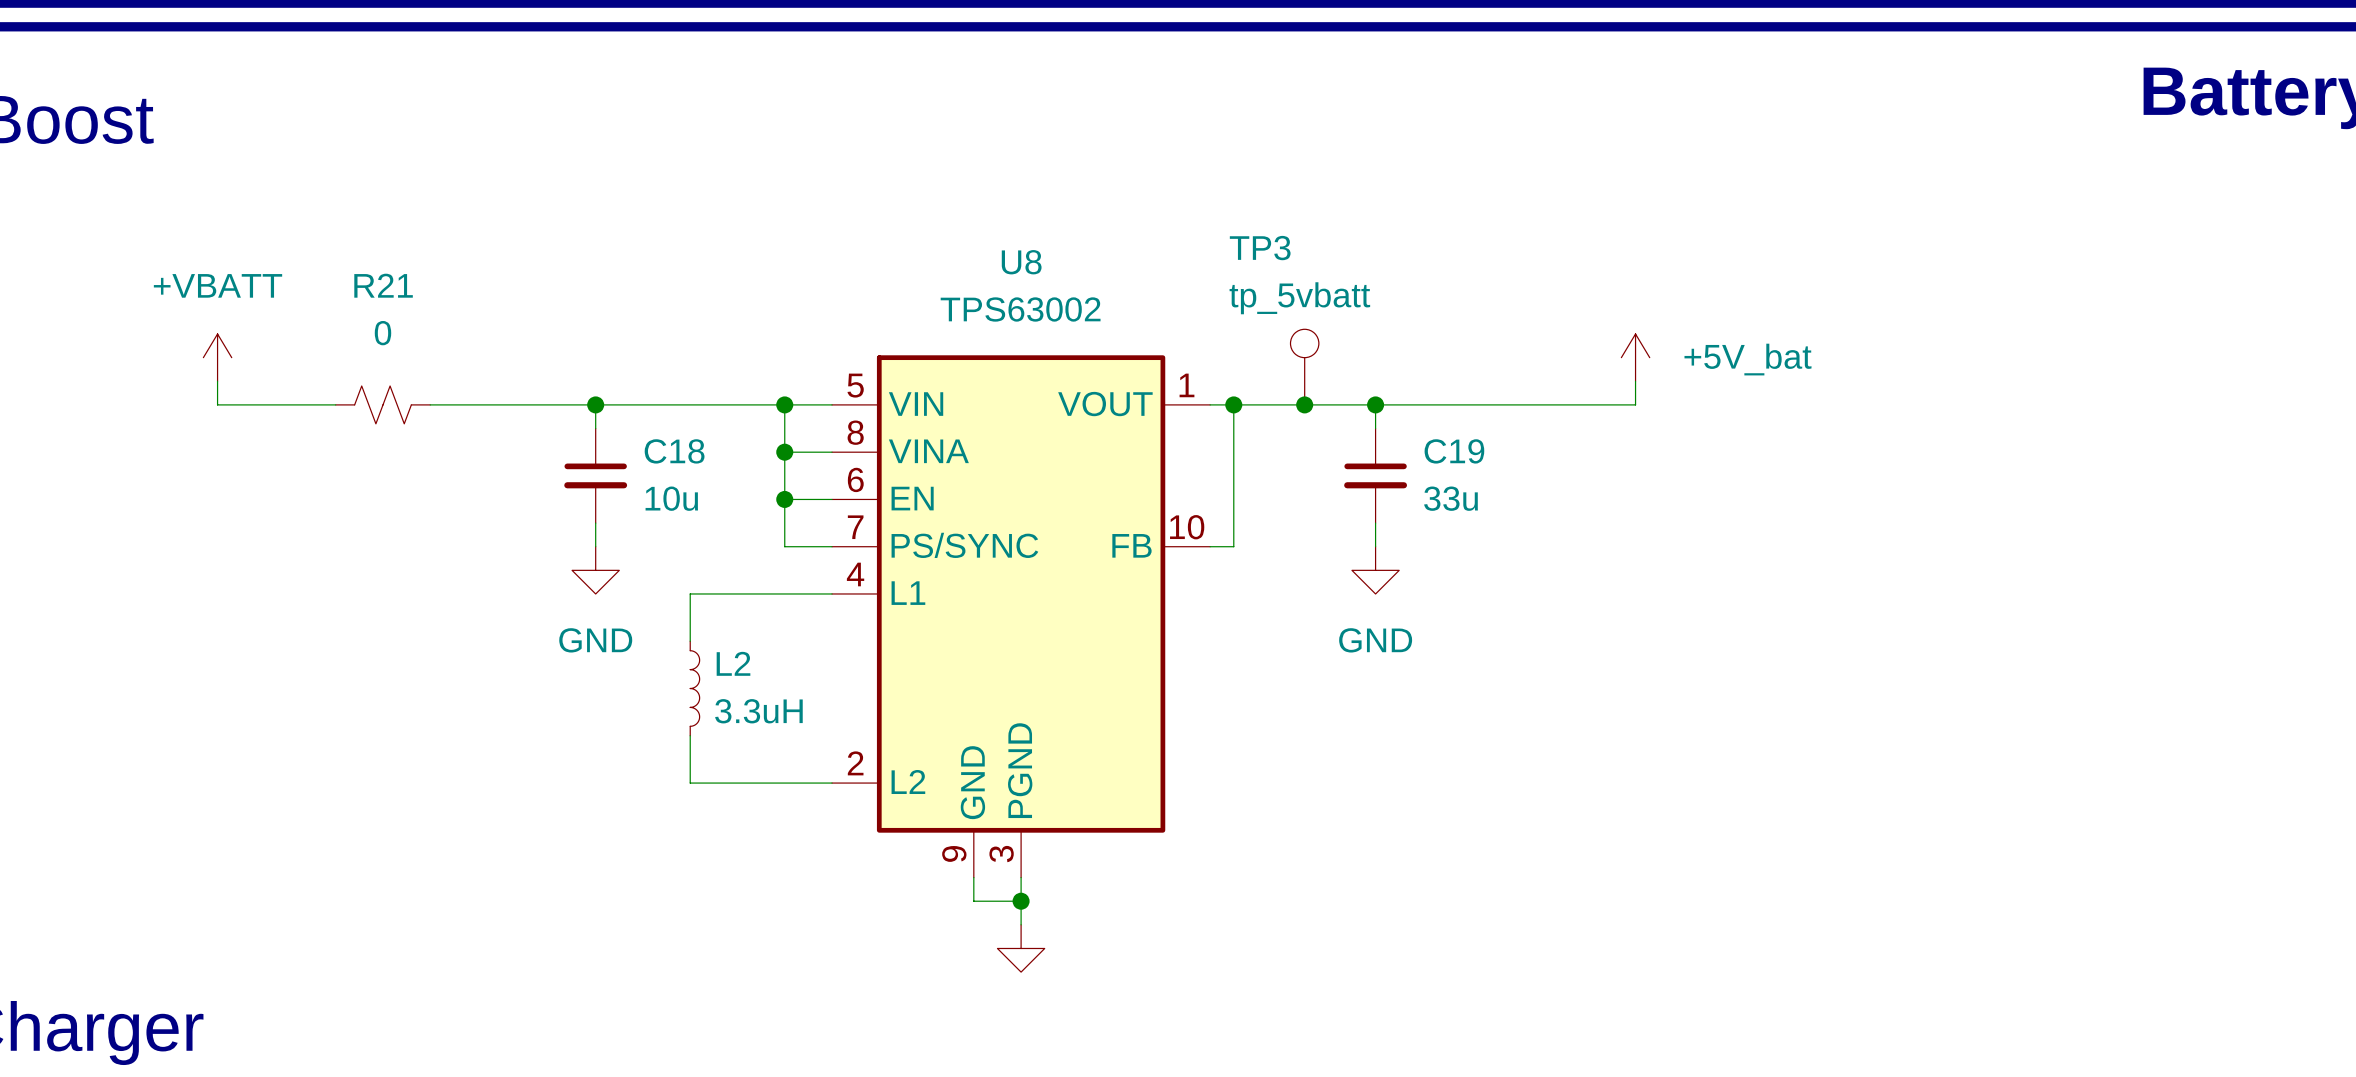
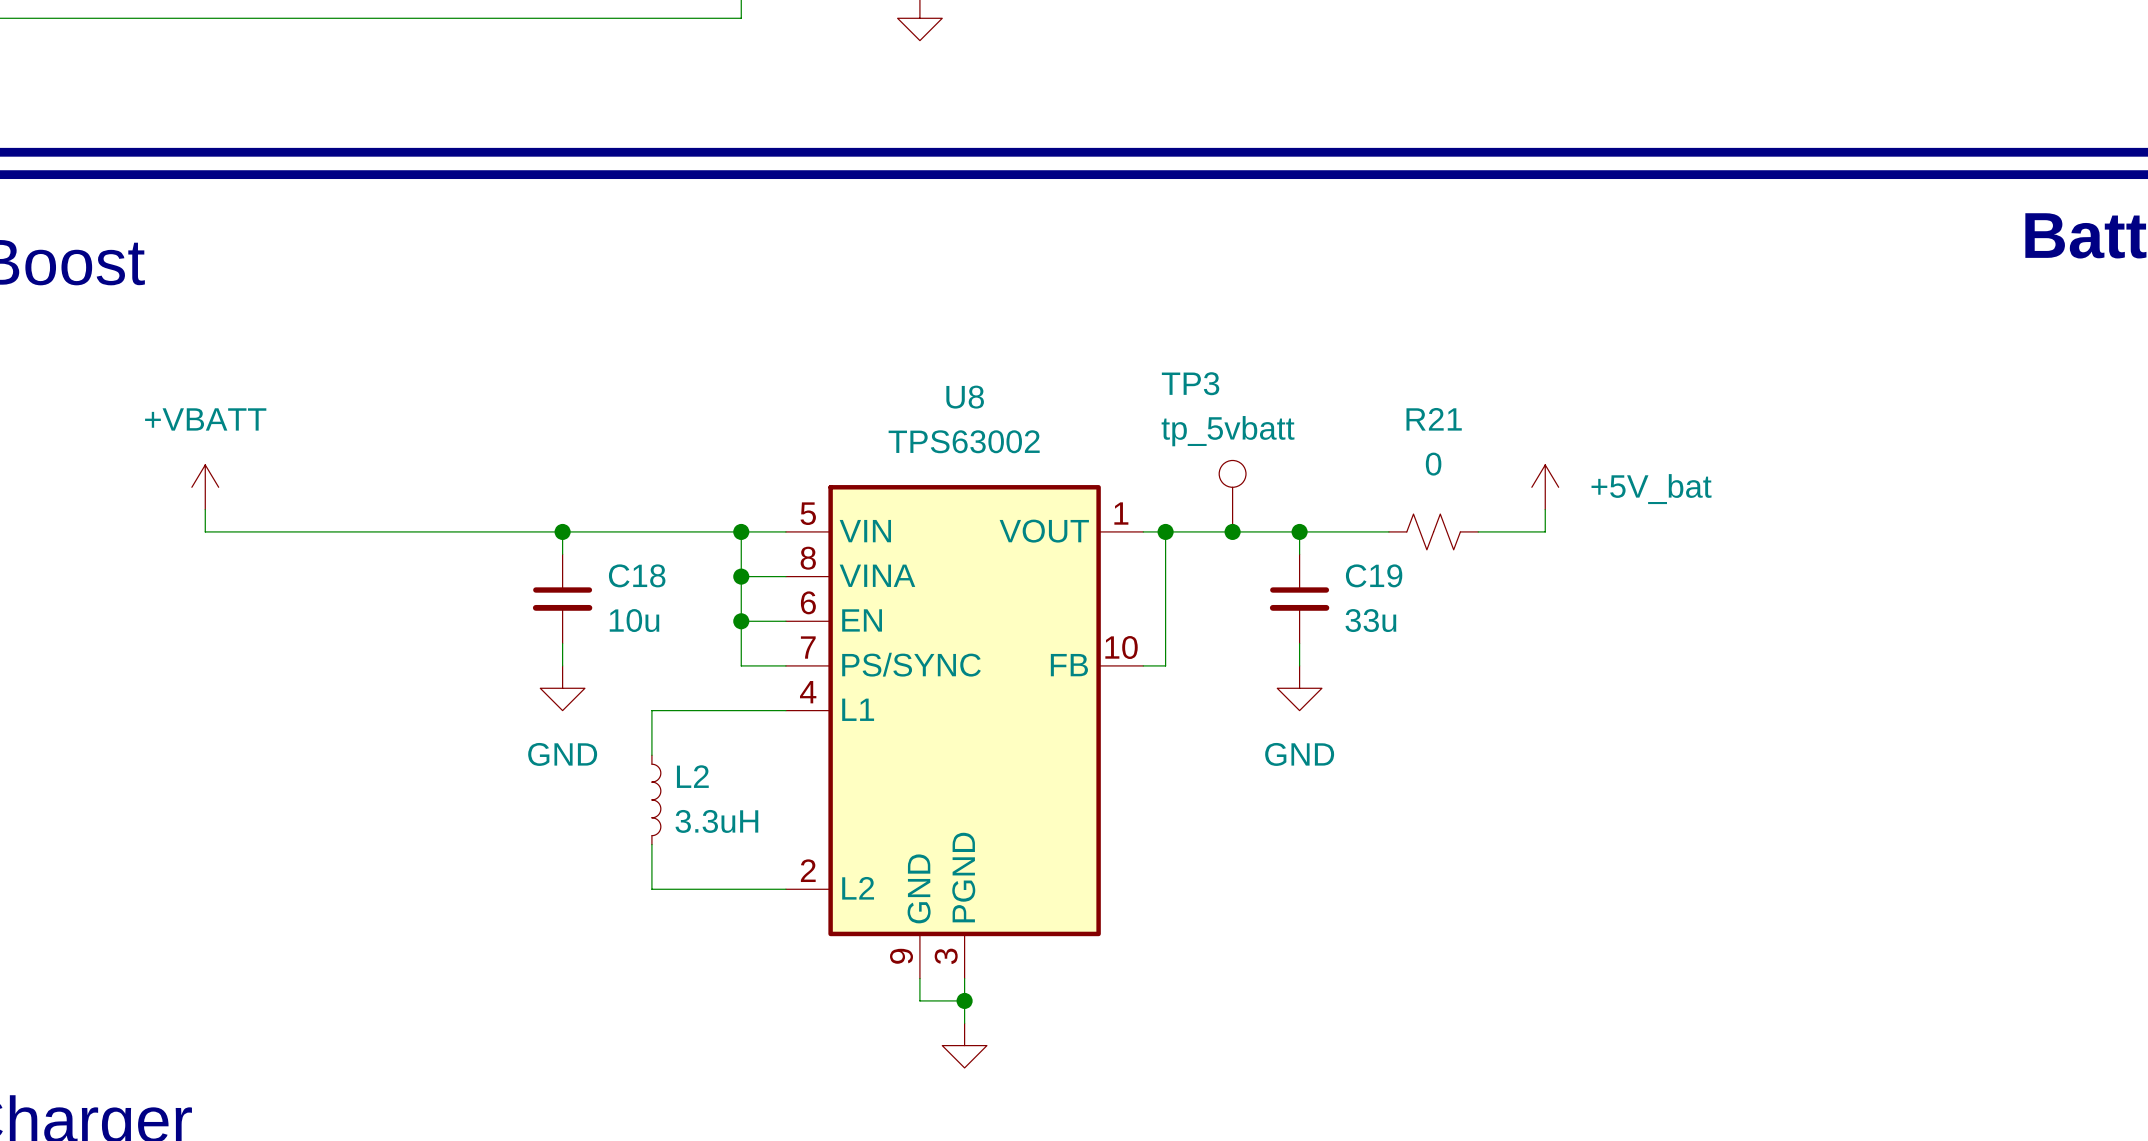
wire: none -> (316, 531) (406, 531)
R21 position: (382, 404) -> (1433, 531)
wire: (1470, 404) (1564, 404) -> none

